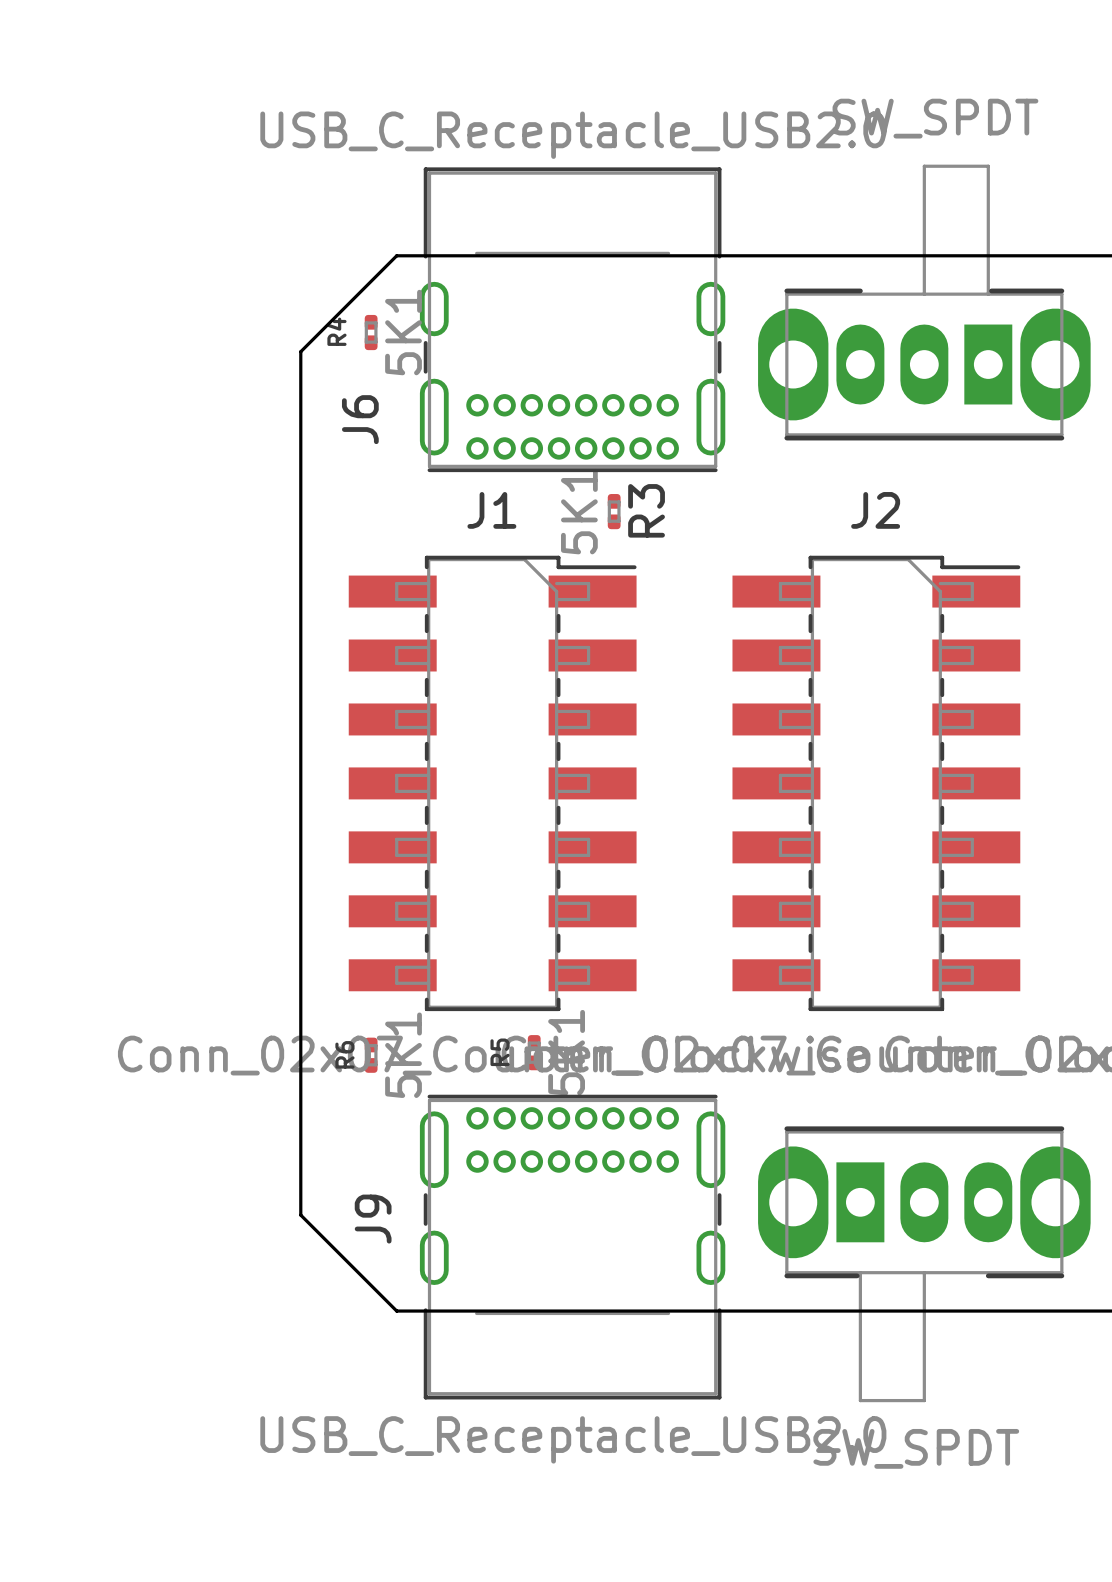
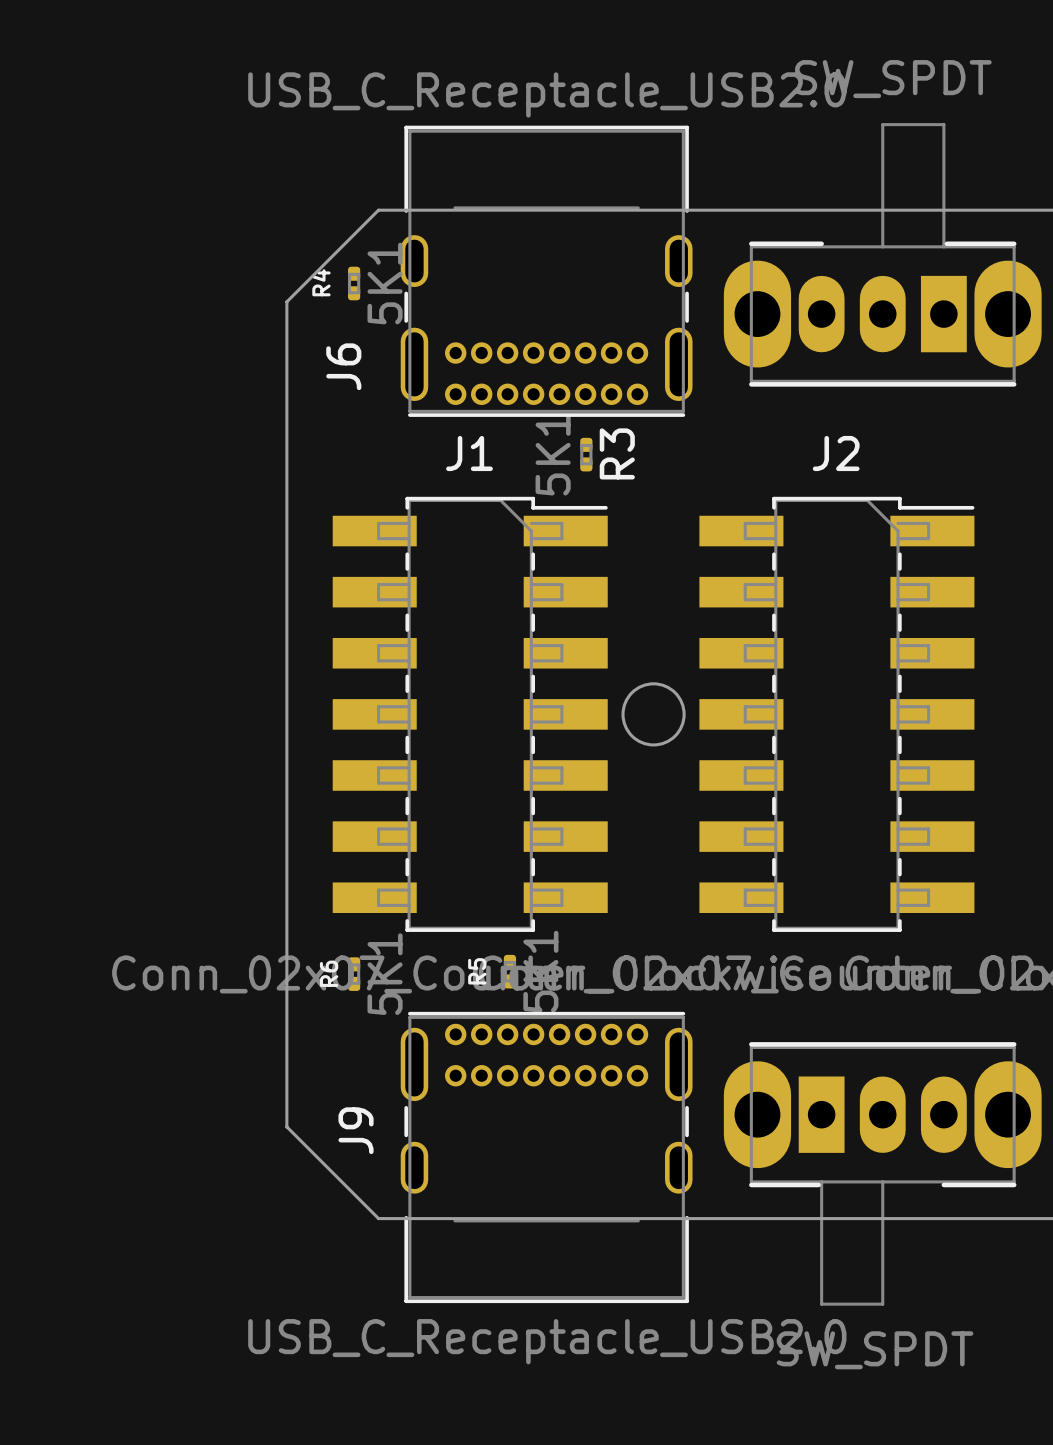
round board edge: none -> [621, 682, 686, 747]

